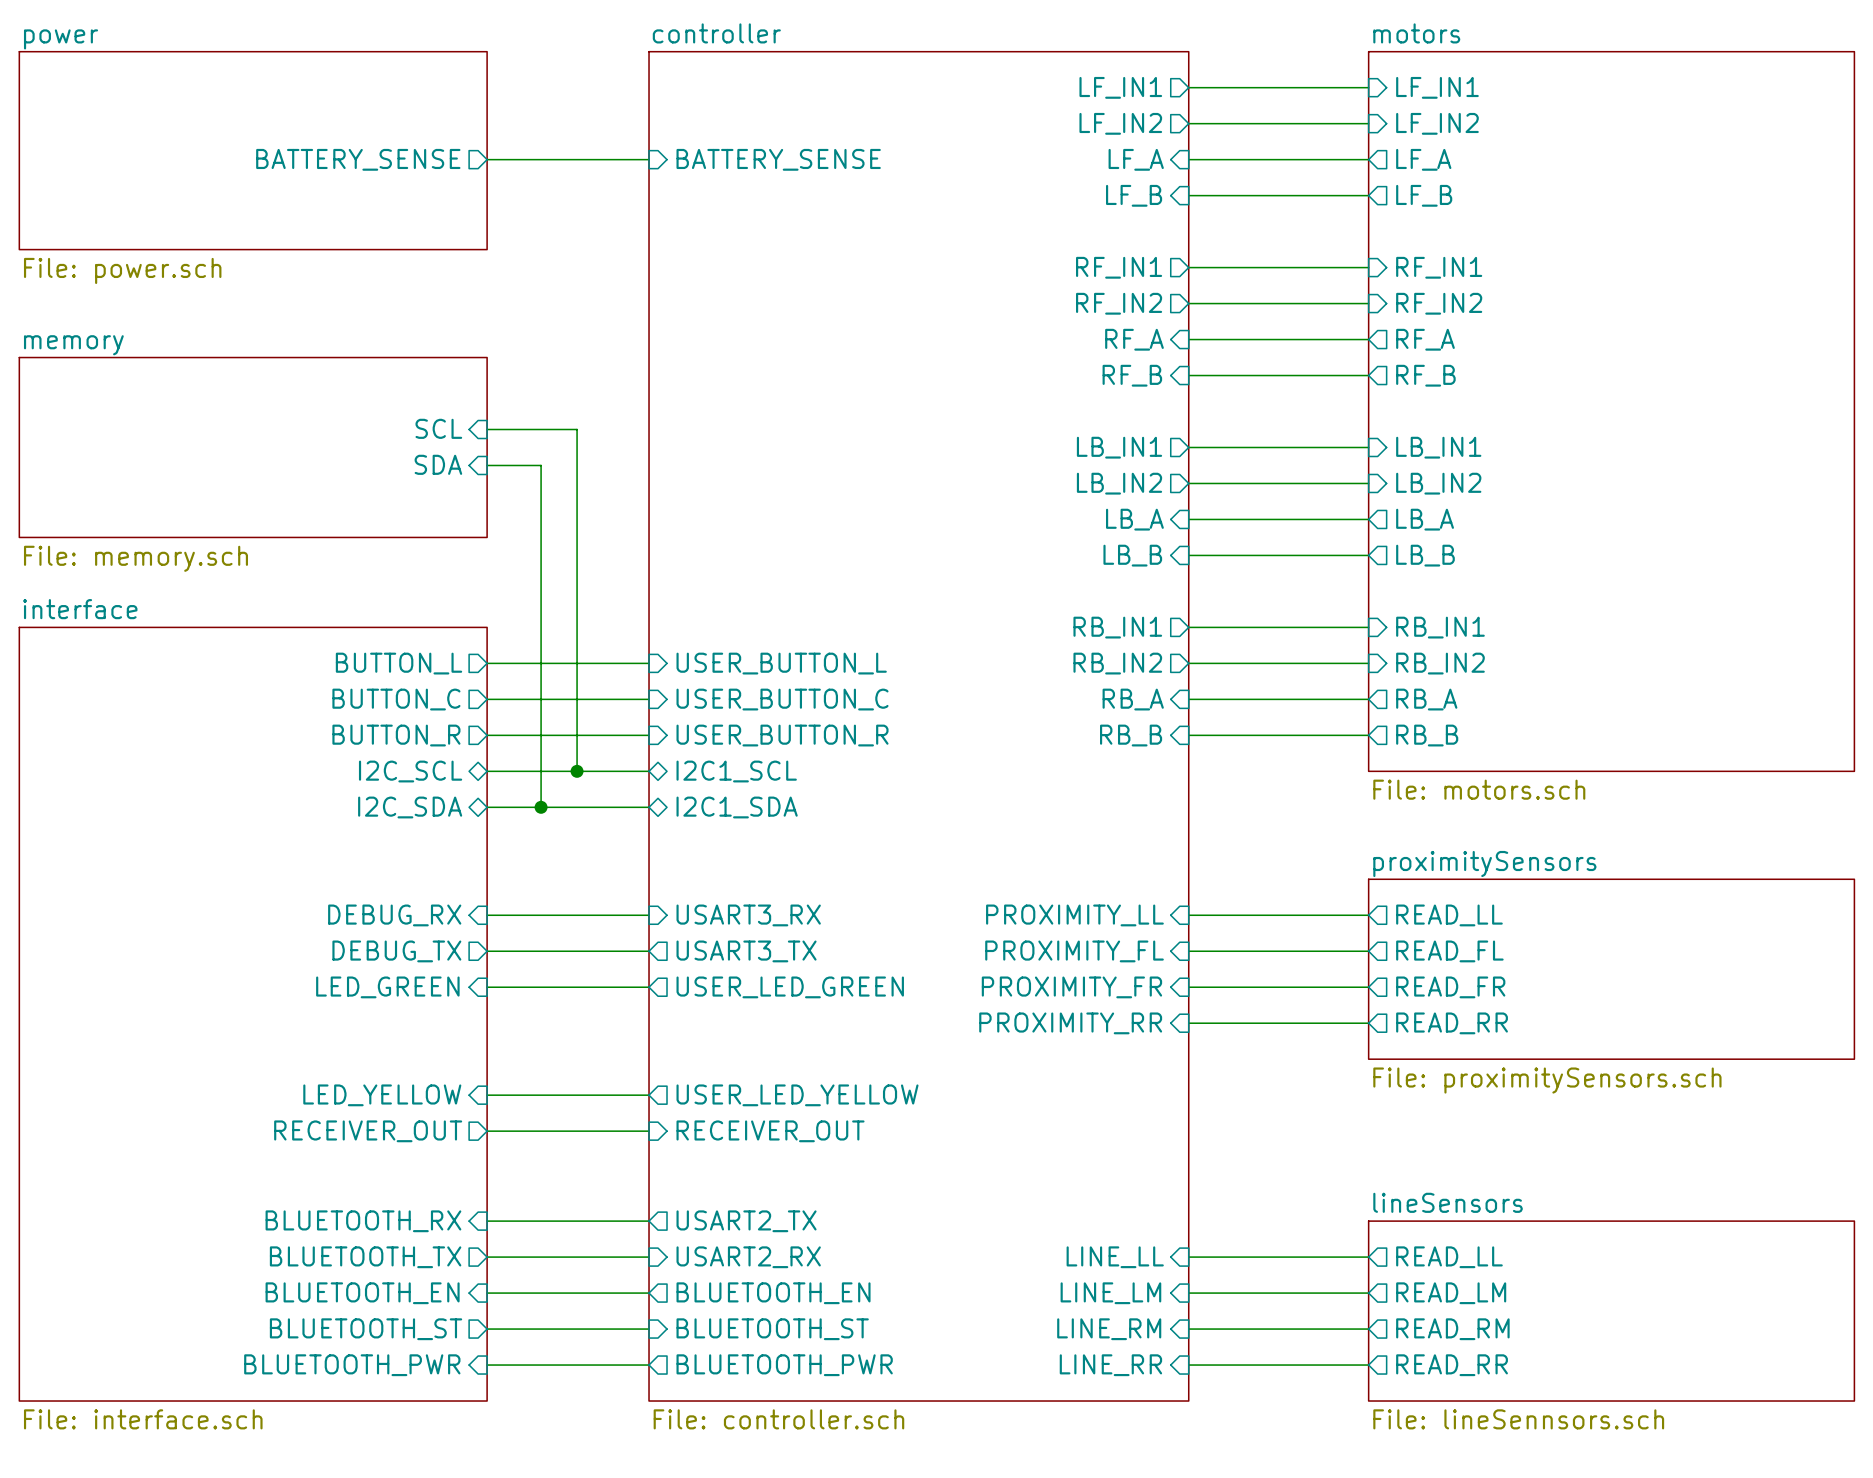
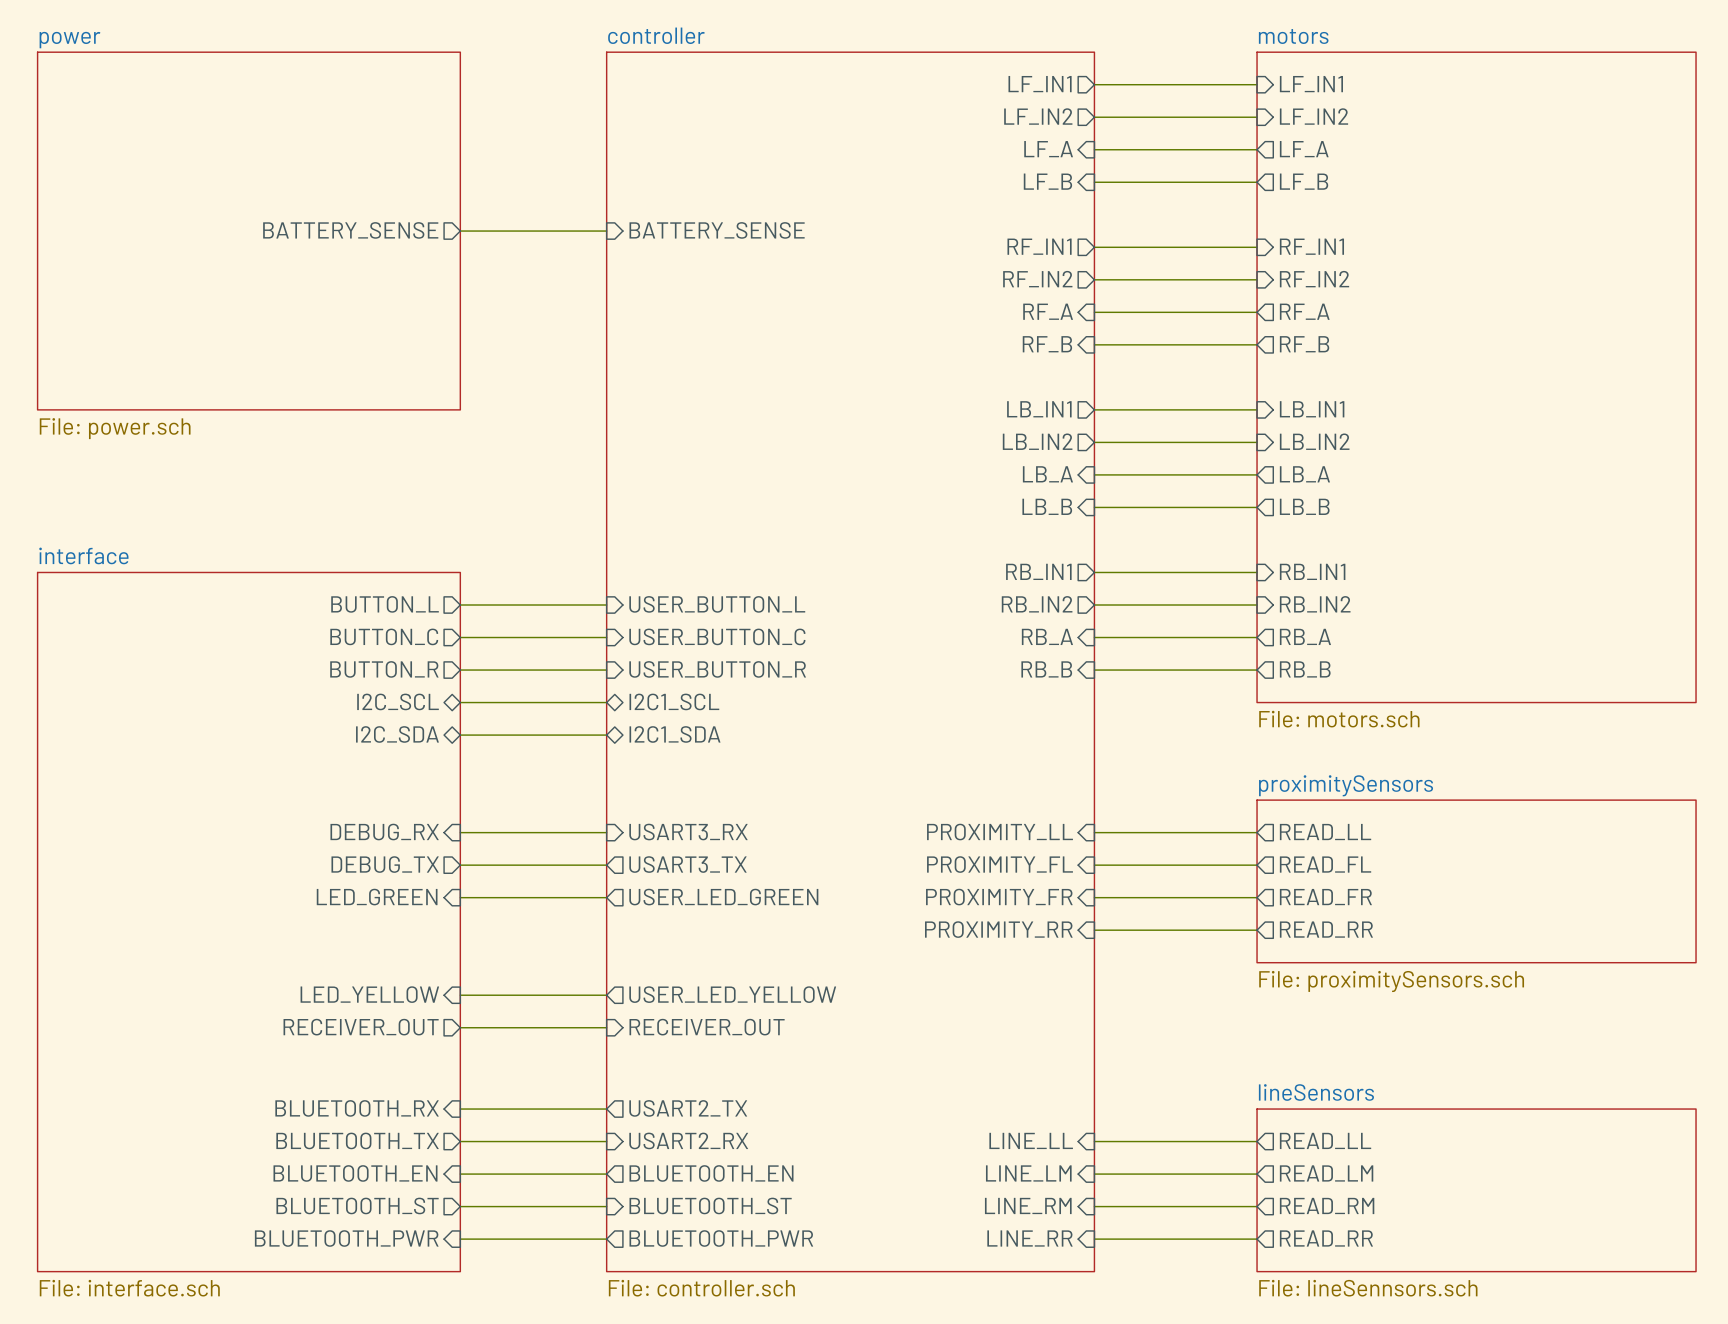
sheet power: File: power.sch (253, 150) -> none
sheet pin position: BATTERY_SENSE (358, 159) -> BATTERY_SENSE (350, 230)
wire: (487, 159) (649, 159) -> (460, 231) (606, 231)
sheet pin position: BATTERY_SENSE (778, 159) -> BATTERY_SENSE (717, 230)
sheet power: none -> File: power.sch (248, 231)
sheet pin: SCL (438, 428) -> none
wire: (487, 429) (577, 429) (577, 771) -> none
sheet memory: File: memory.sch (253, 447) -> none
sheet pin: SDA (438, 464) -> none
wire: (487, 465) (541, 465) (541, 807) -> none
junction: (577, 771) -> none
junction: (541, 807) -> none

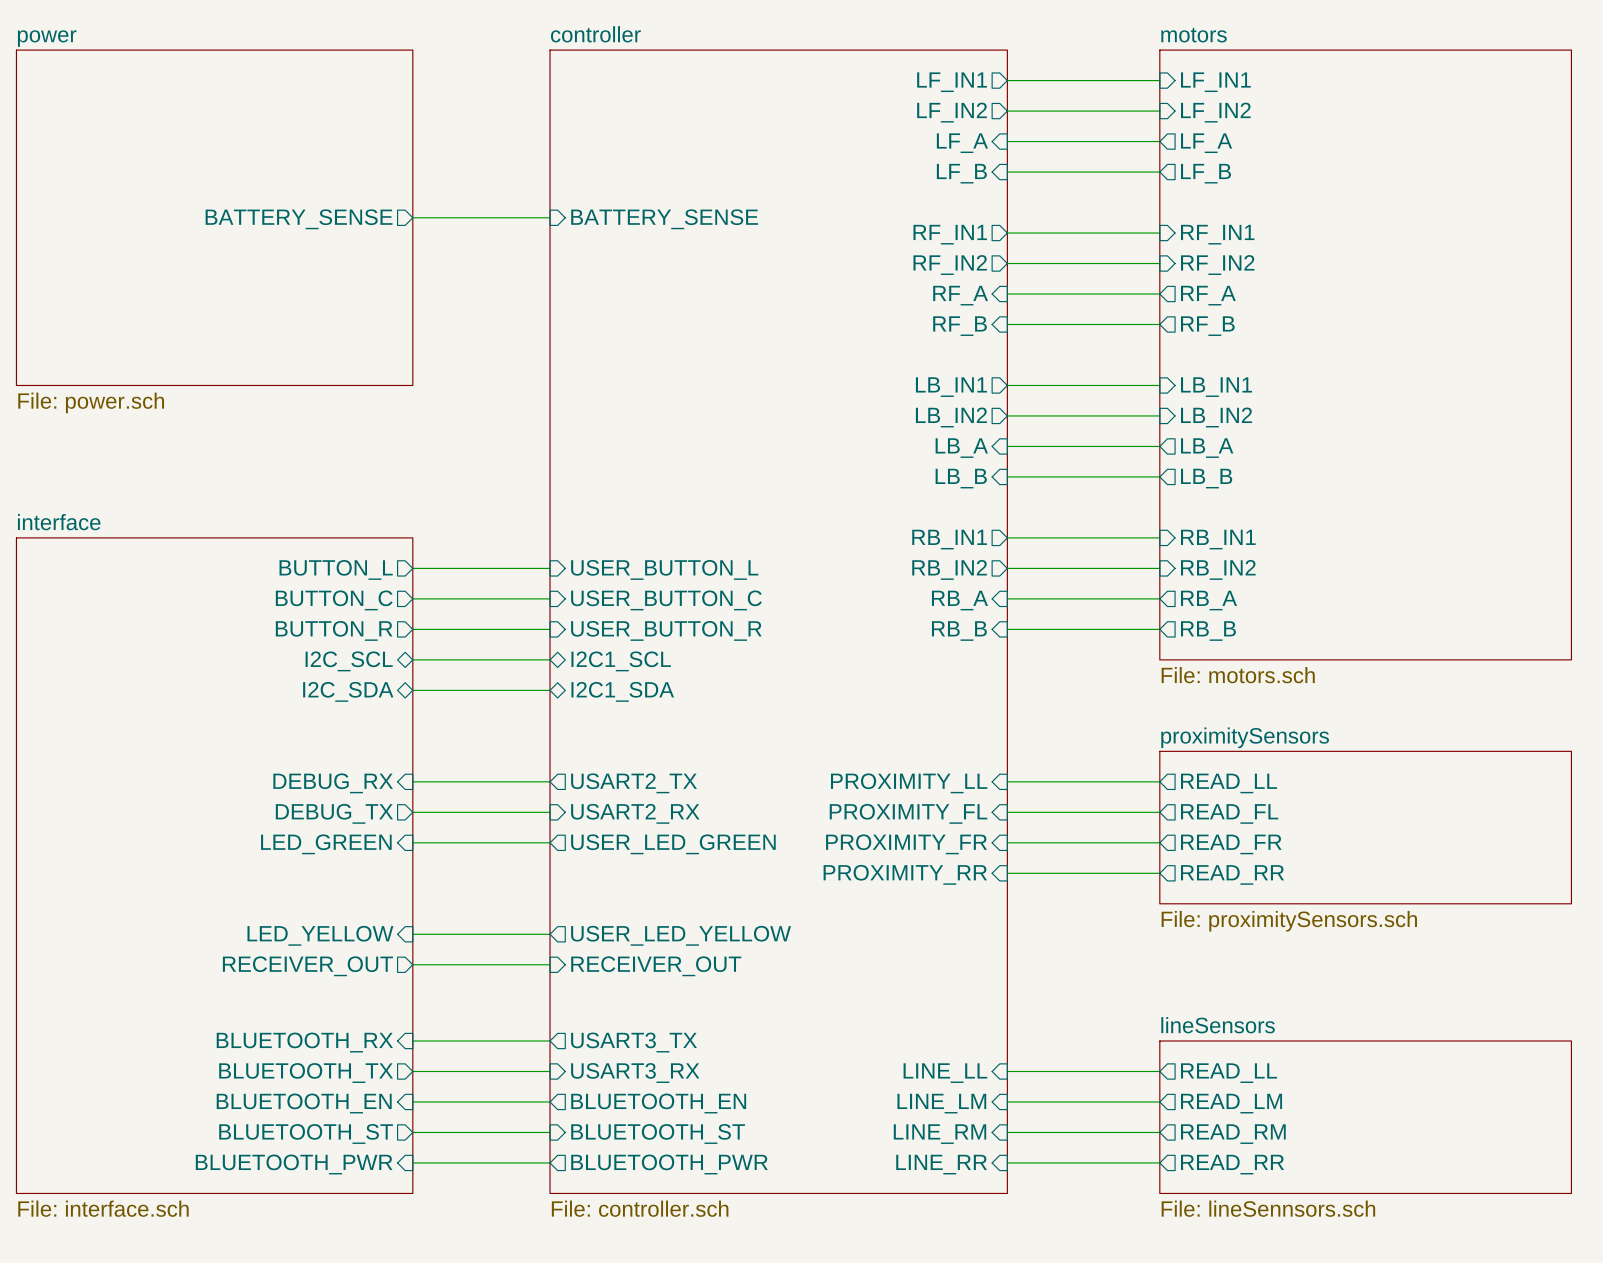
sheet pin shape: input (688, 832) -> output (634, 783)
sheet pin: USART3_RX (688, 832) -> USART2_TX (634, 783)
sheet pin shape: output (687, 864) -> input (635, 813)
sheet pin: USART3_TX (687, 864) -> USART2_RX (635, 813)
sheet pin: USART2_TX (688, 1108) -> USART3_TX (634, 1042)
sheet pin: USART2_RX (688, 1140) -> USART3_RX (635, 1073)

